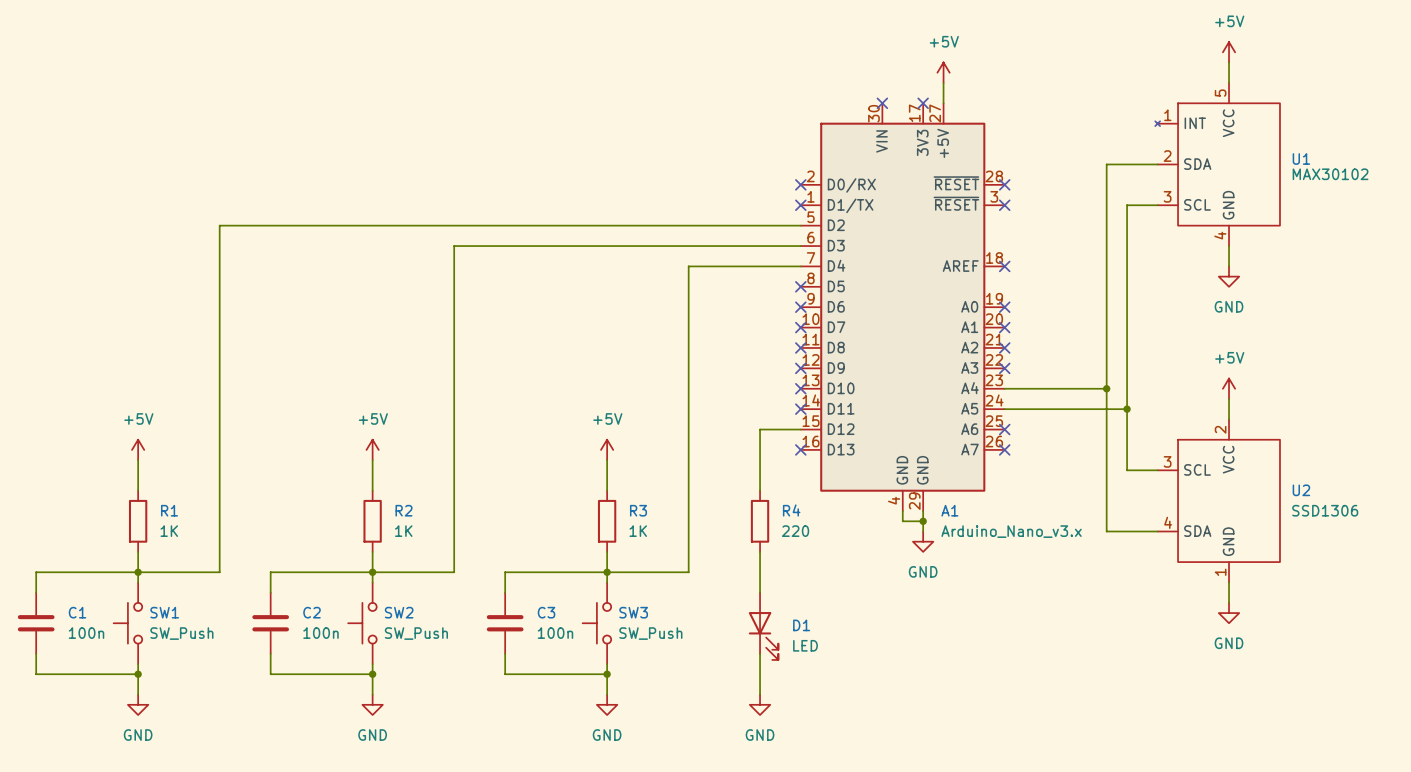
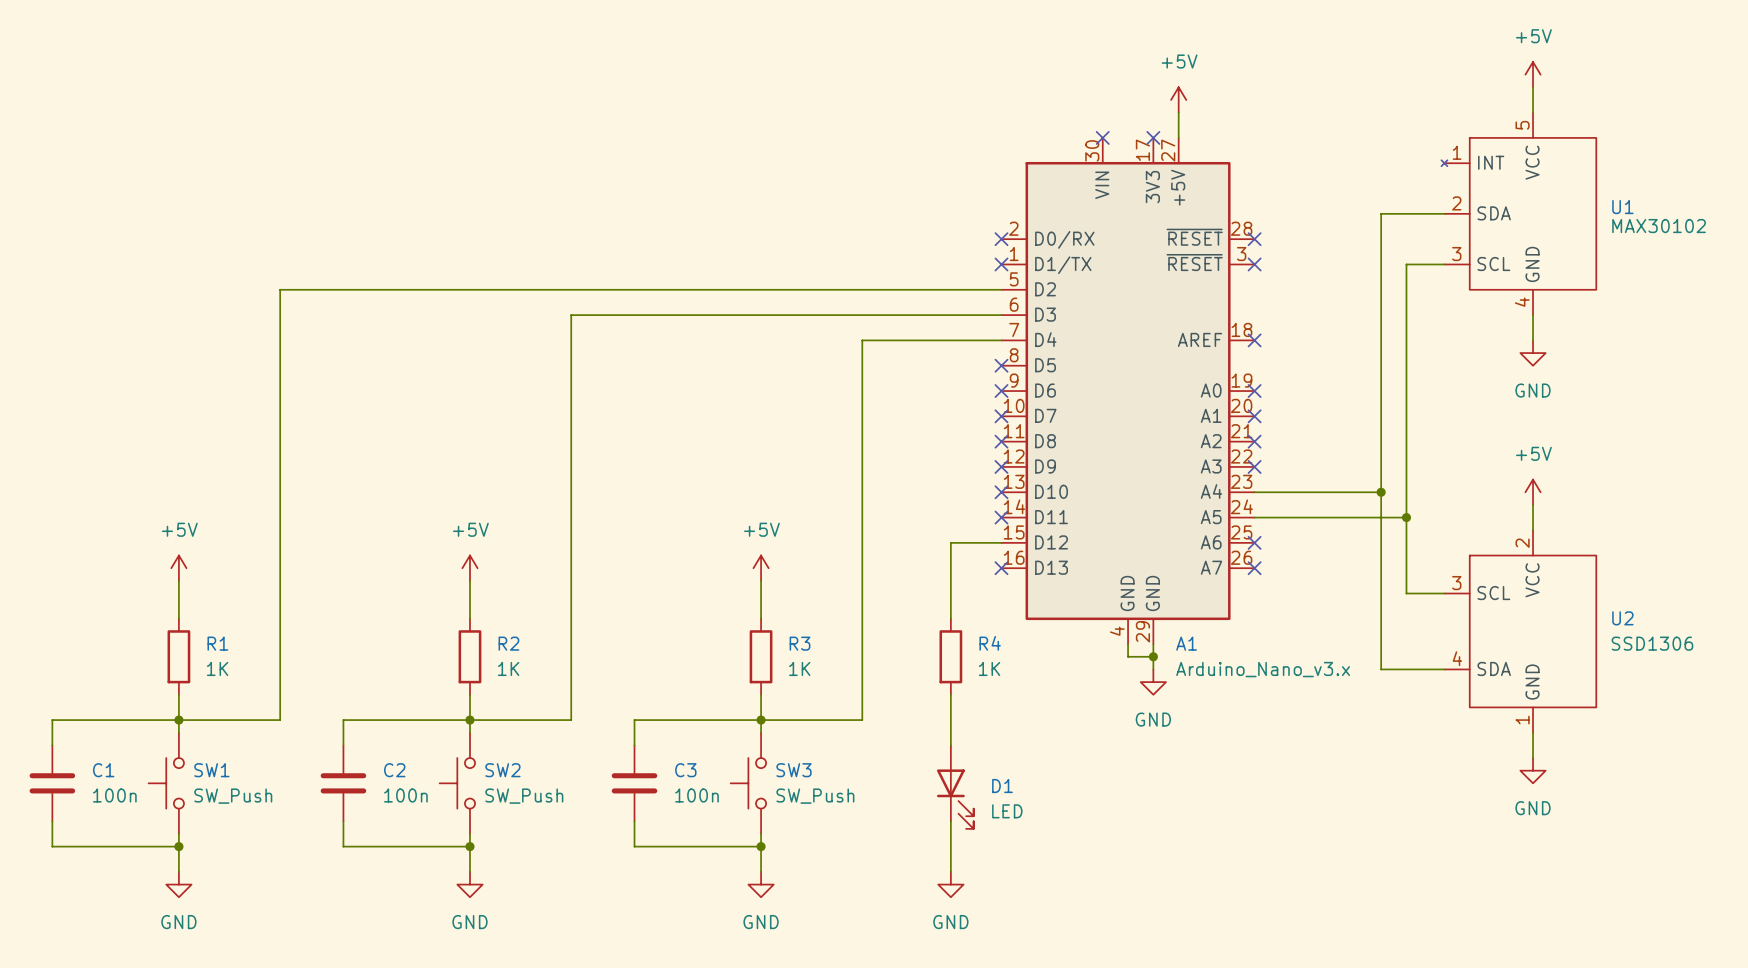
R4 value: 220 (795, 531) -> 1K (989, 668)

